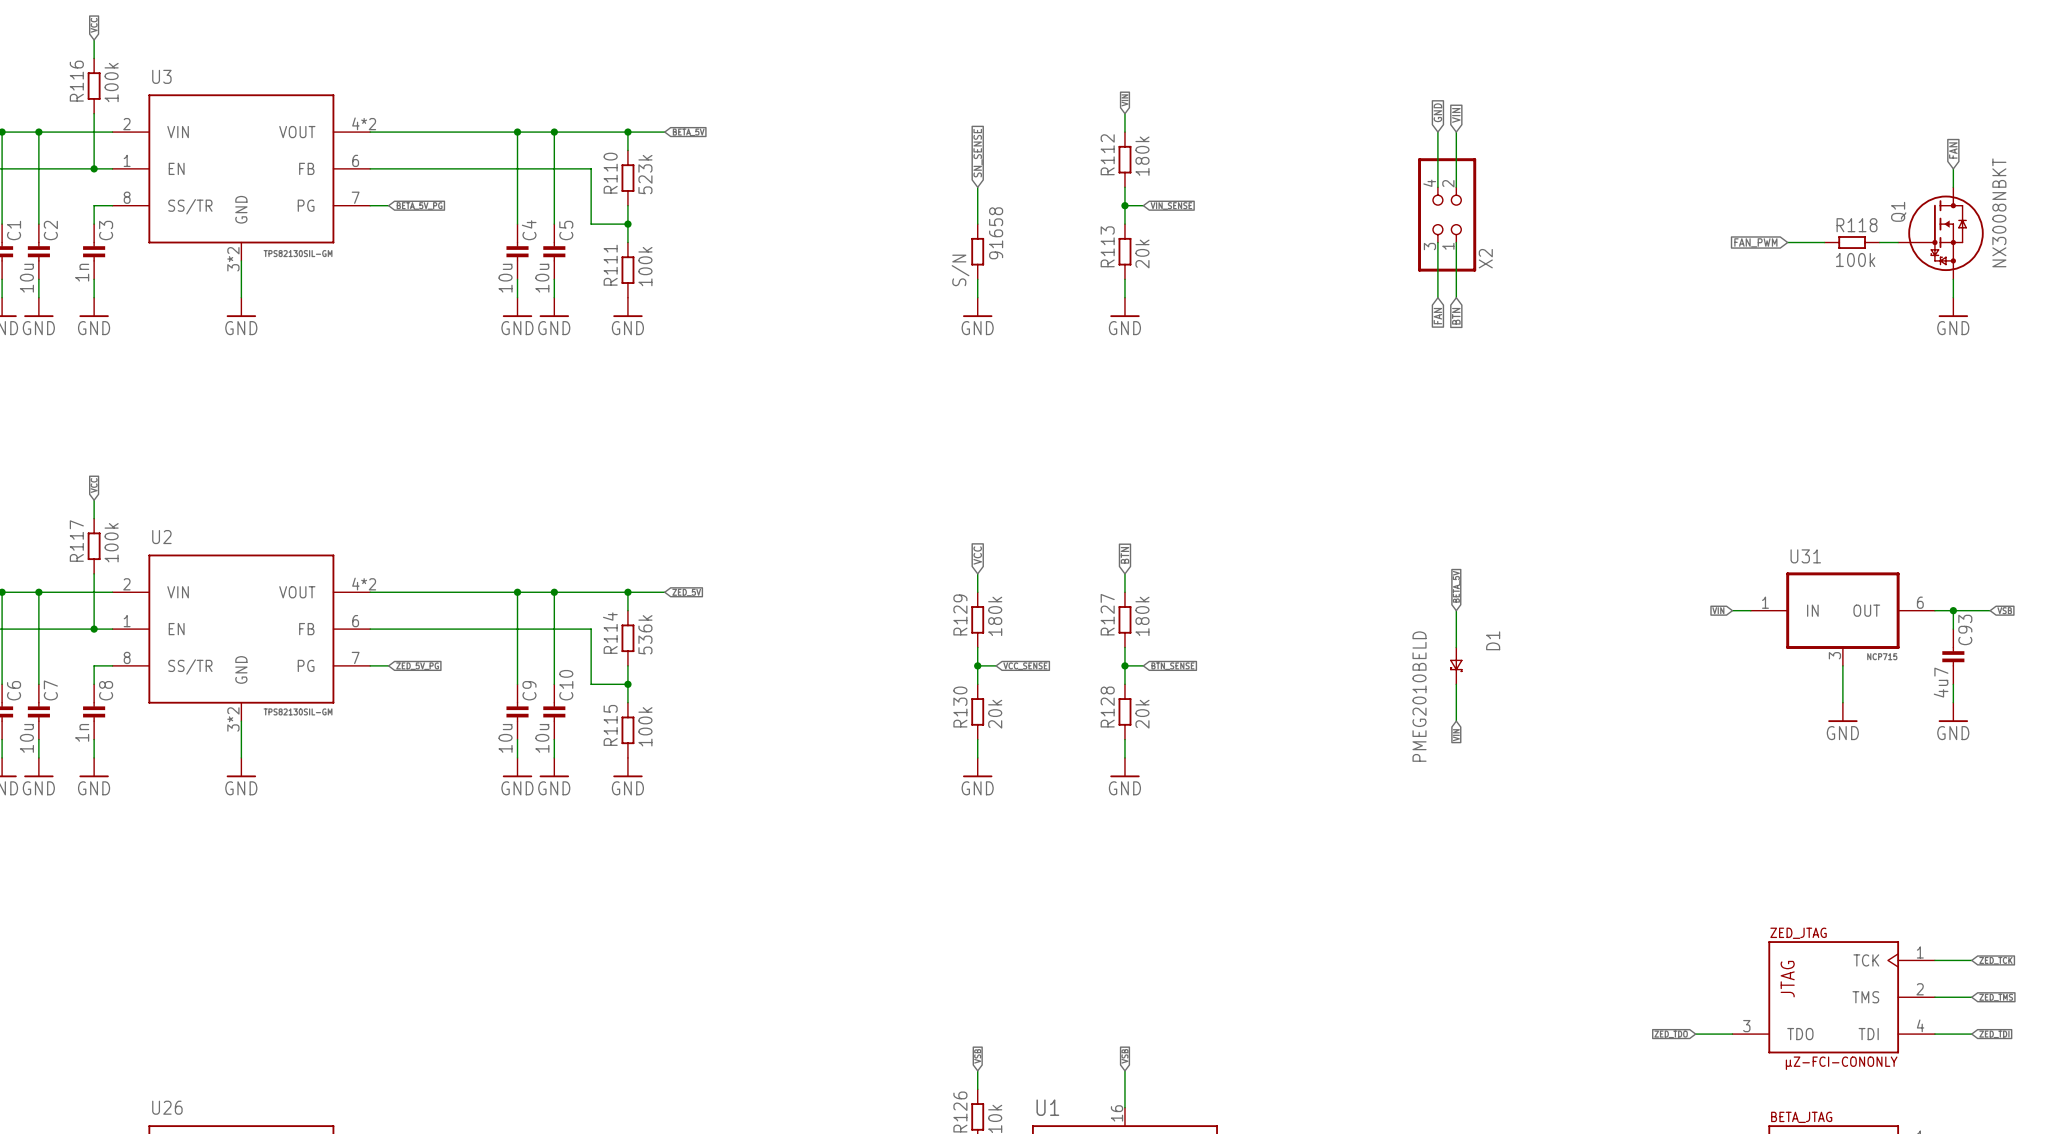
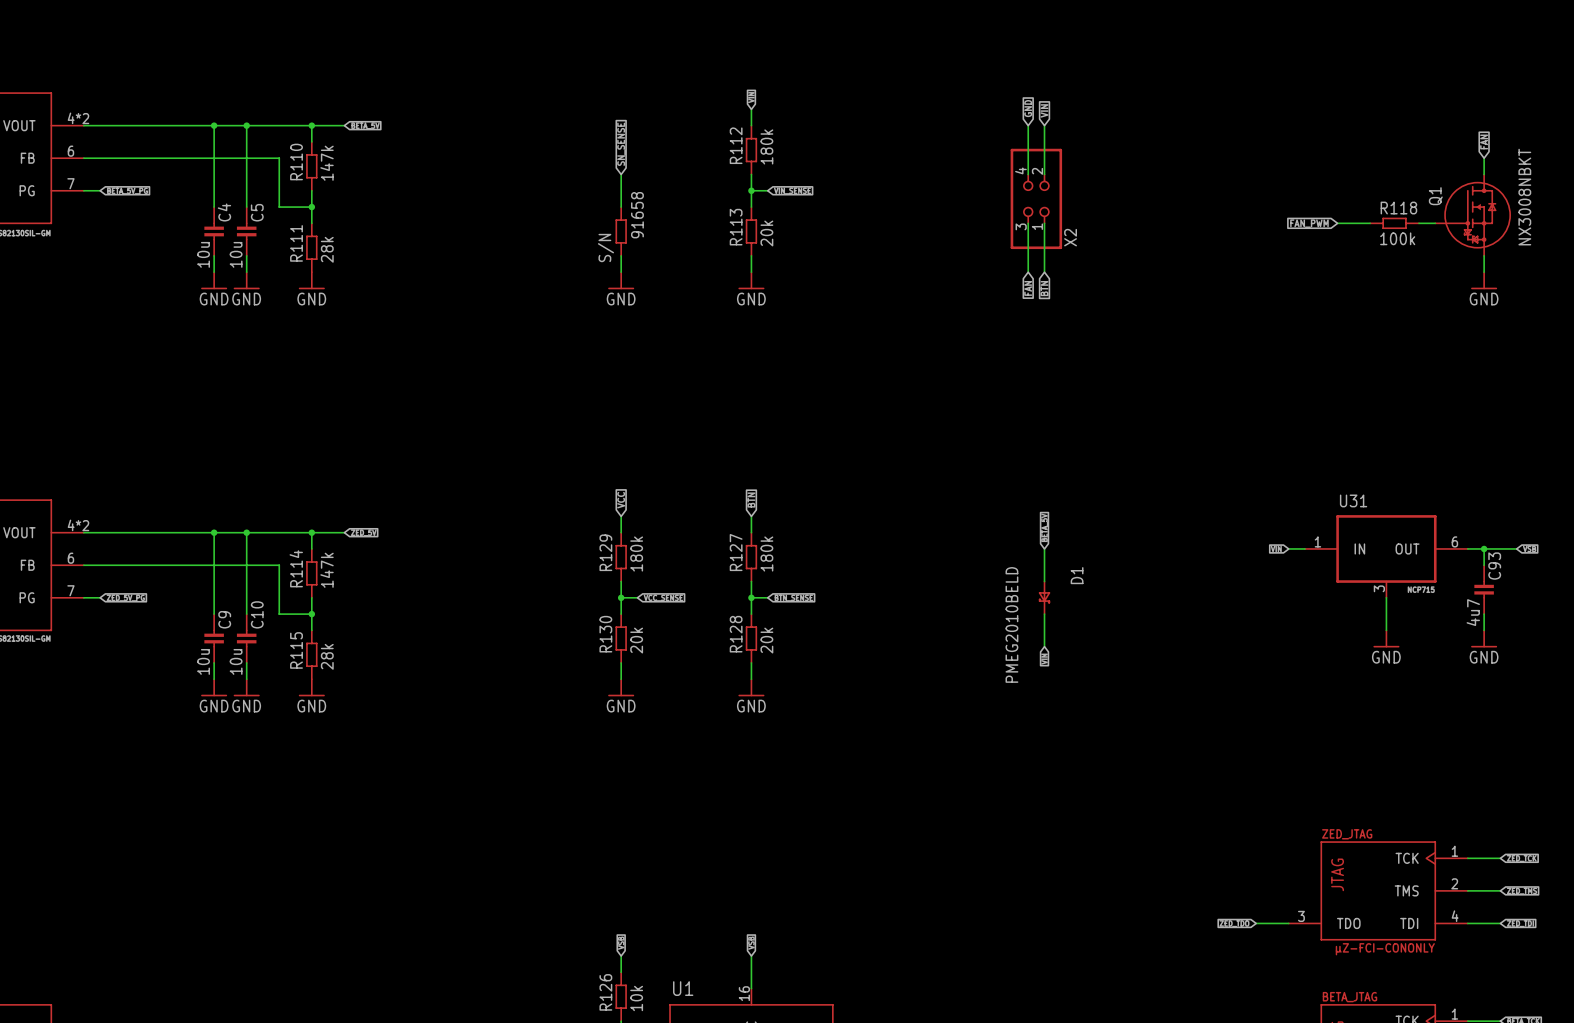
R110 value: 523k (645, 174) -> 147k (327, 163)
R111 value: 100k (645, 266) -> 28k (327, 249)
R114 value: 536k (645, 634) -> 147k (327, 570)
R115 value: 100k (645, 726) -> 28k (327, 656)

